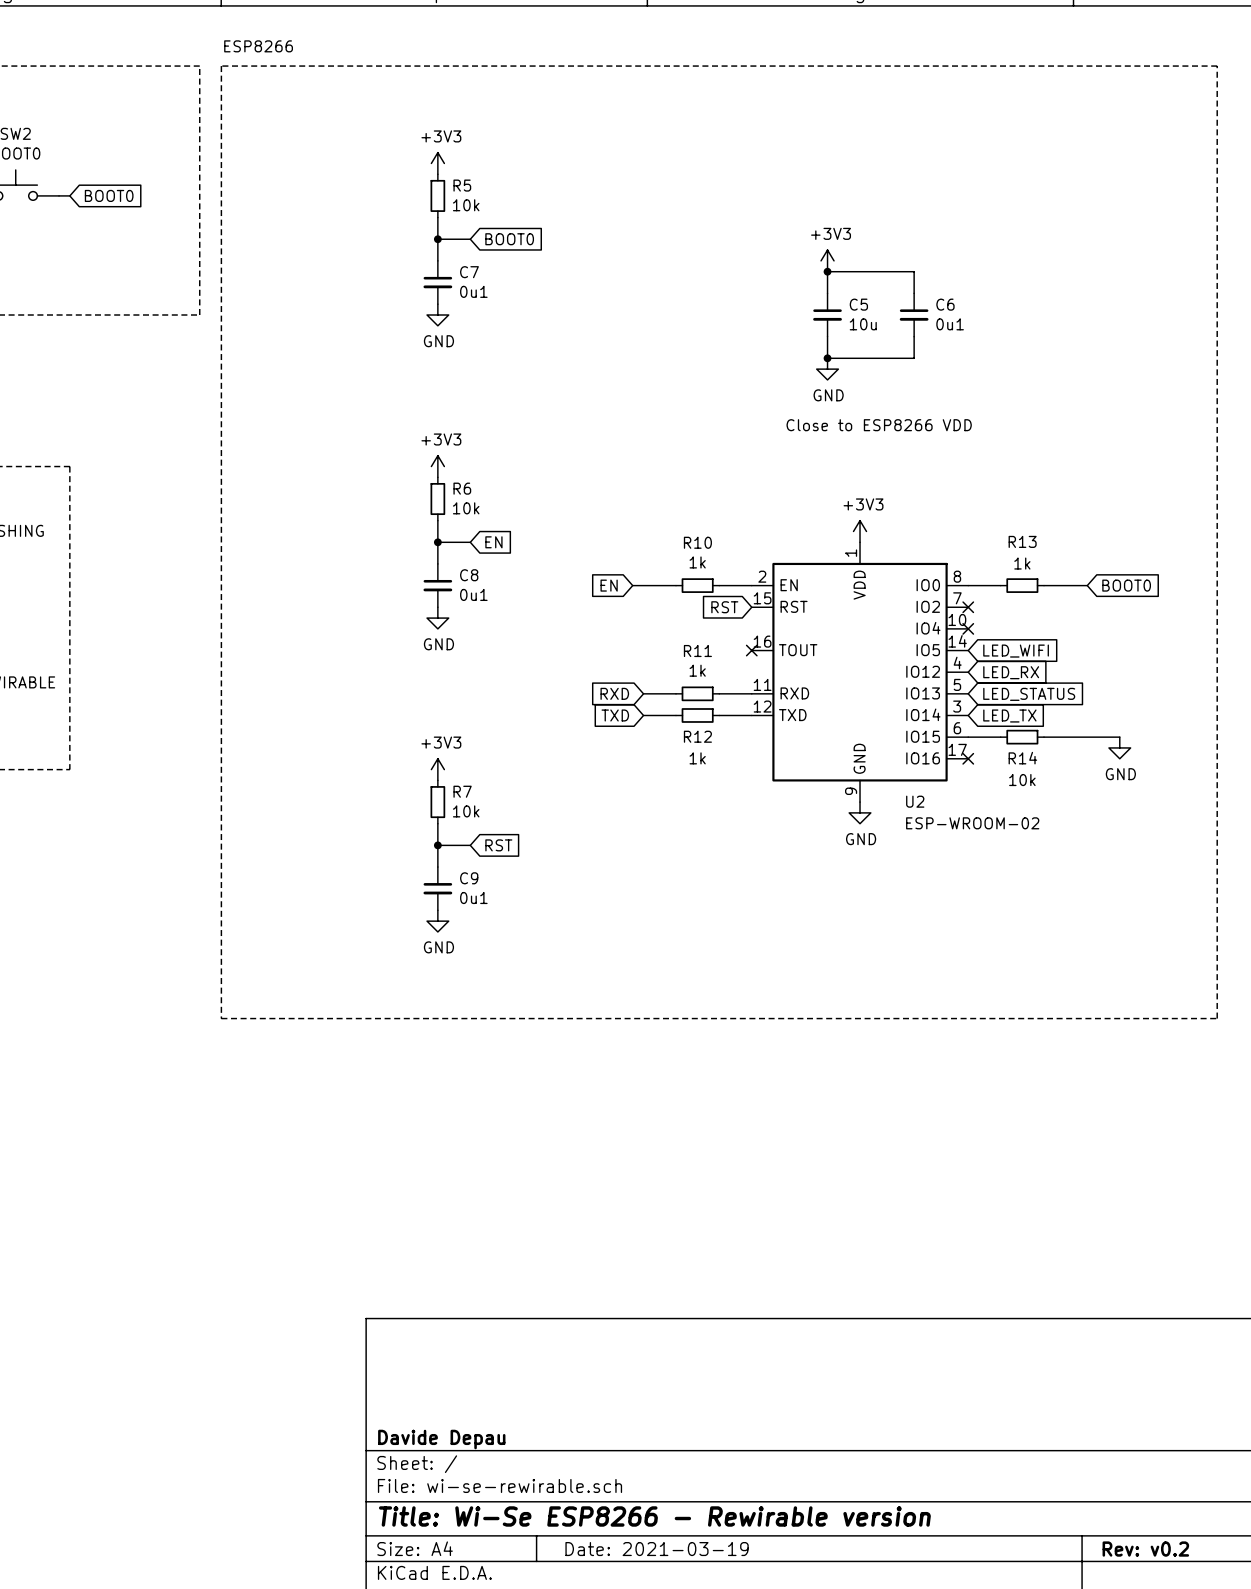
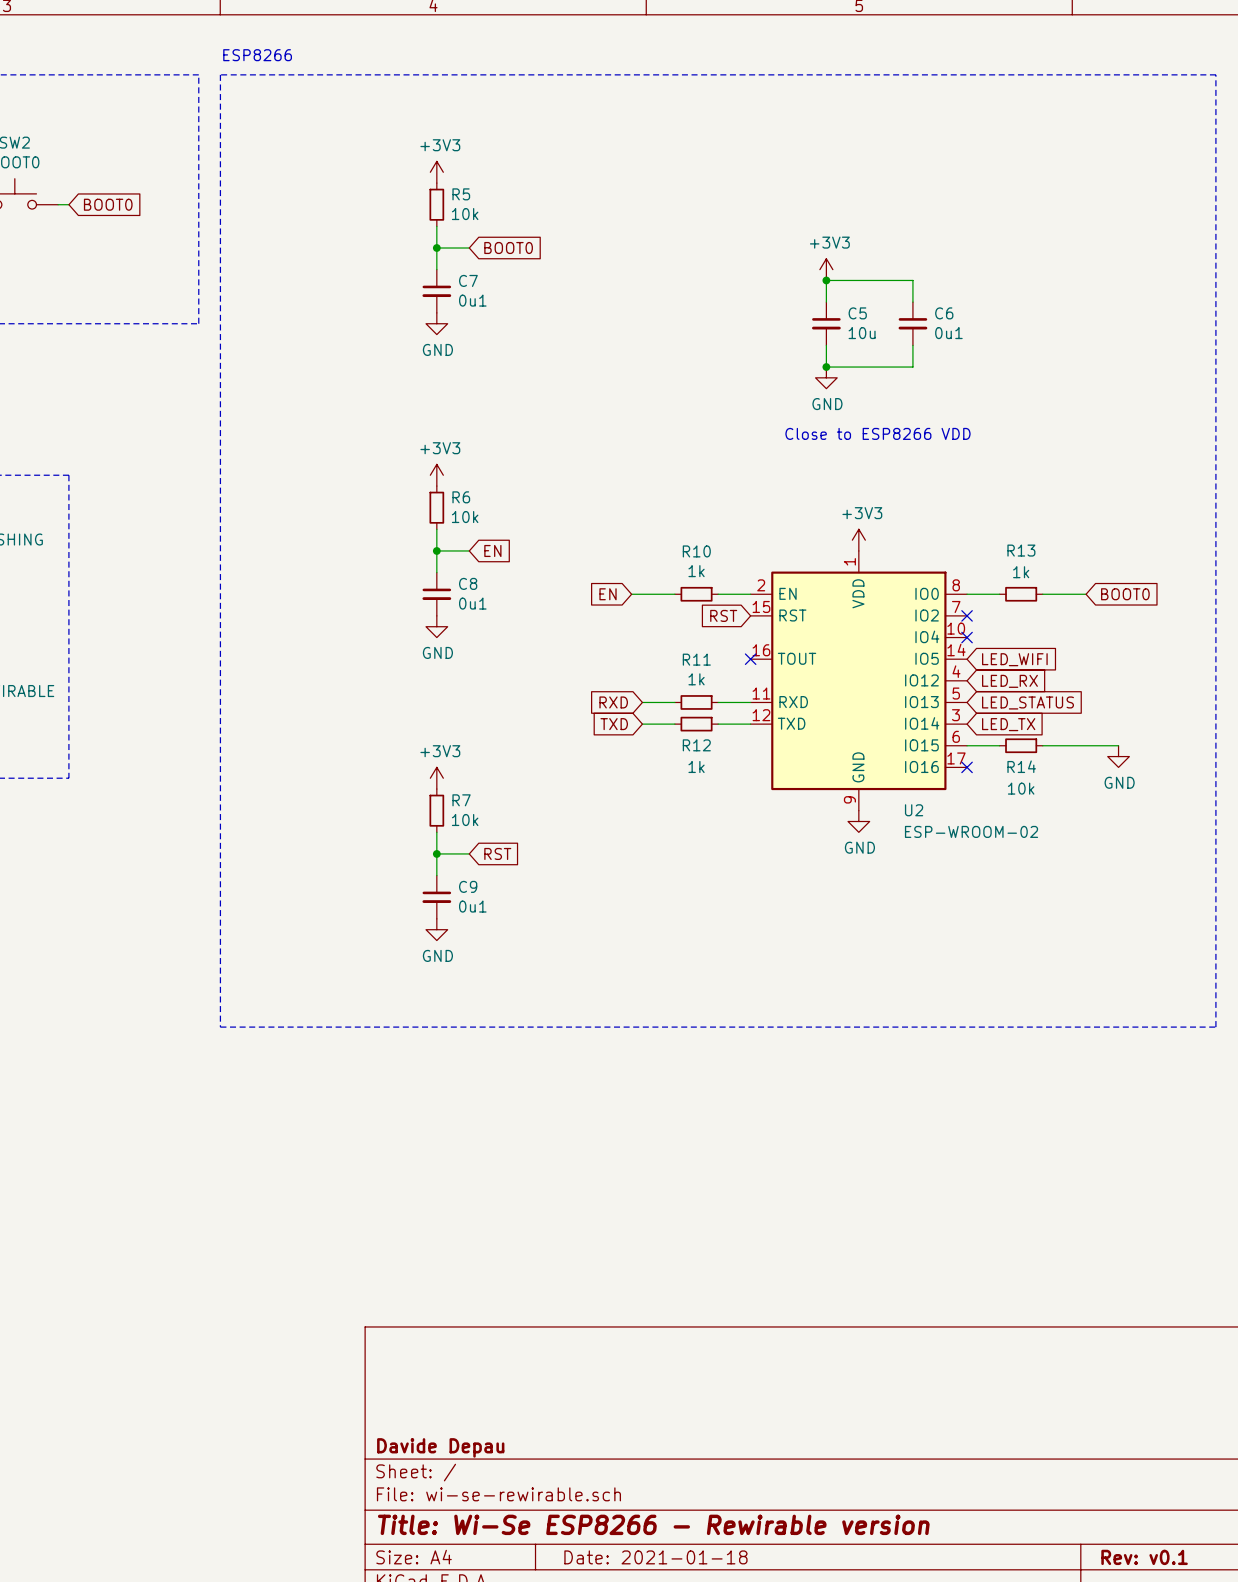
title block: Date: 2021-03-19 (657, 1549) -> Date: 2021-01-18 (655, 1557)
title block: Rev: v0.2 (1145, 1549) -> Rev: v0.1 (1144, 1557)

